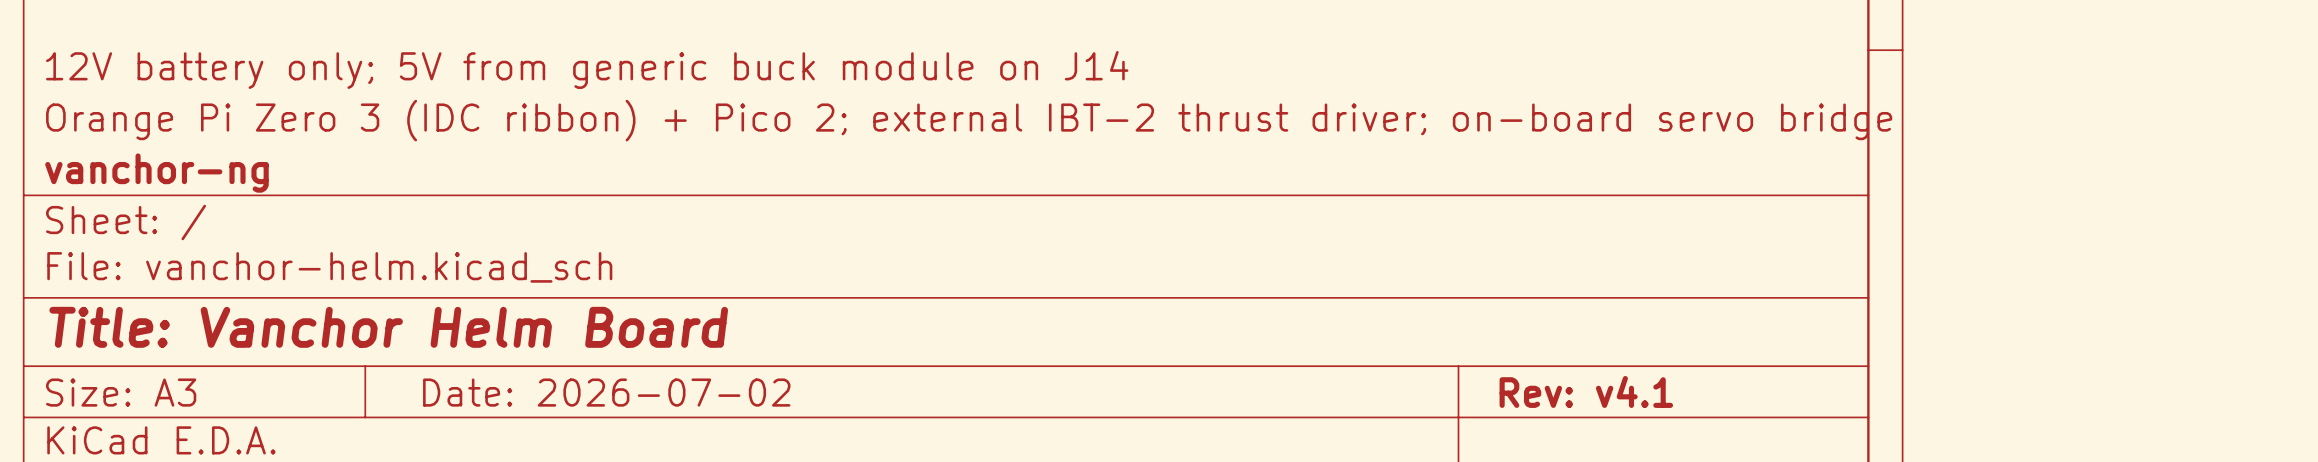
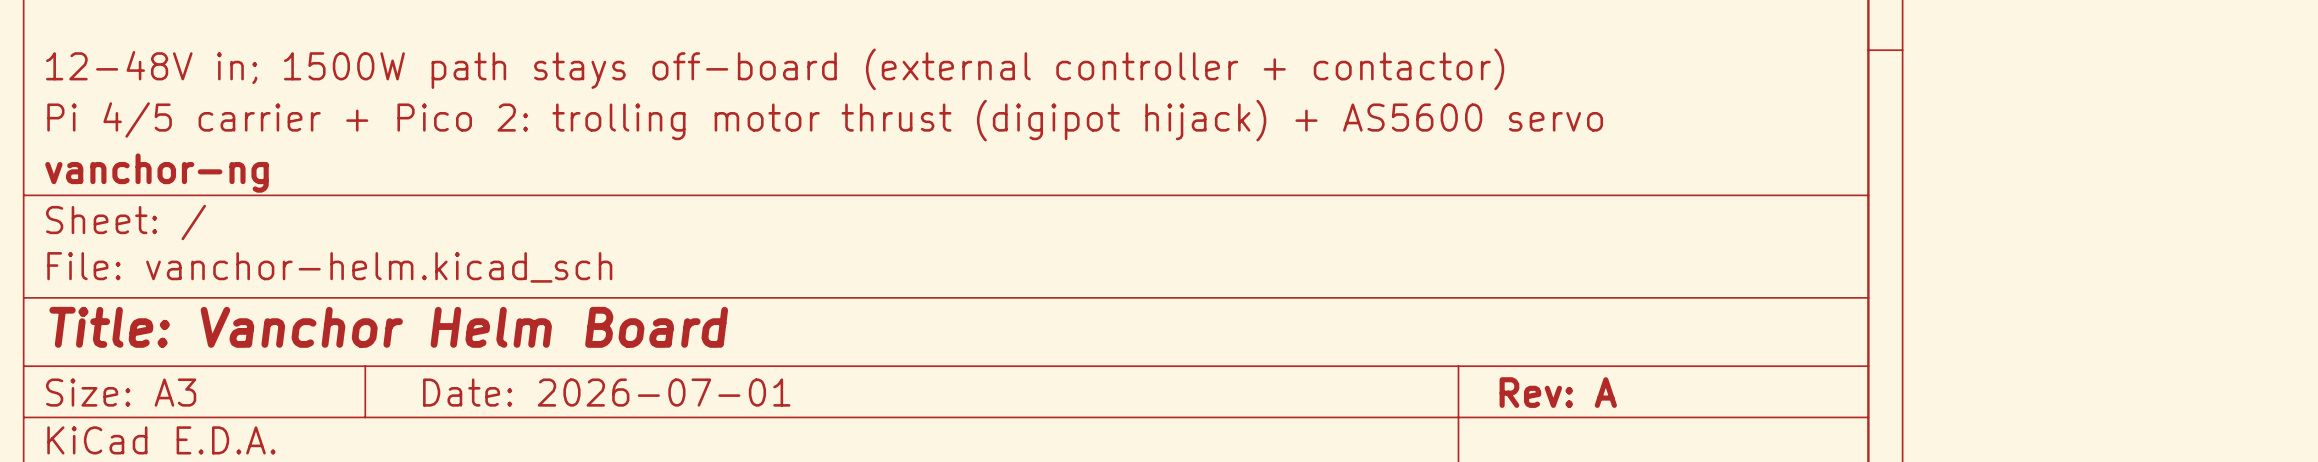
title block: 12V battery only; 5V from generic buck module on J14 (587, 69) -> 12-48V in; 1500W path stays off-board (external controller + contactor) (775, 69)
title block: Orange Pi Zero 3 (IDC ribbon) + Pico 2; external IBT-2 thrust driver; on-board servo bridge (969, 120) -> Pi 4/5 carrier + Pico 2: trolling motor thrust (digipot hijack) + AS5600 servo (825, 120)
title block: Rev: v4.1 (1586, 391) -> Rev: A (1558, 392)
title block: Date: 2026-07-02 (606, 392) -> Date: 2026-07-01 (606, 392)

